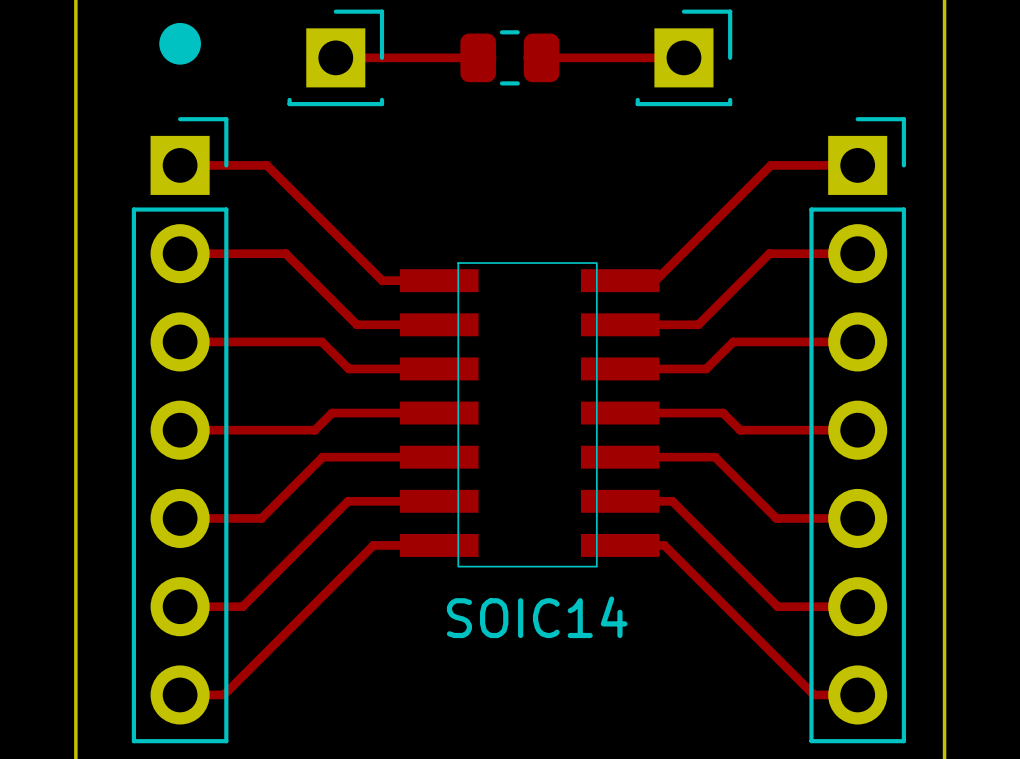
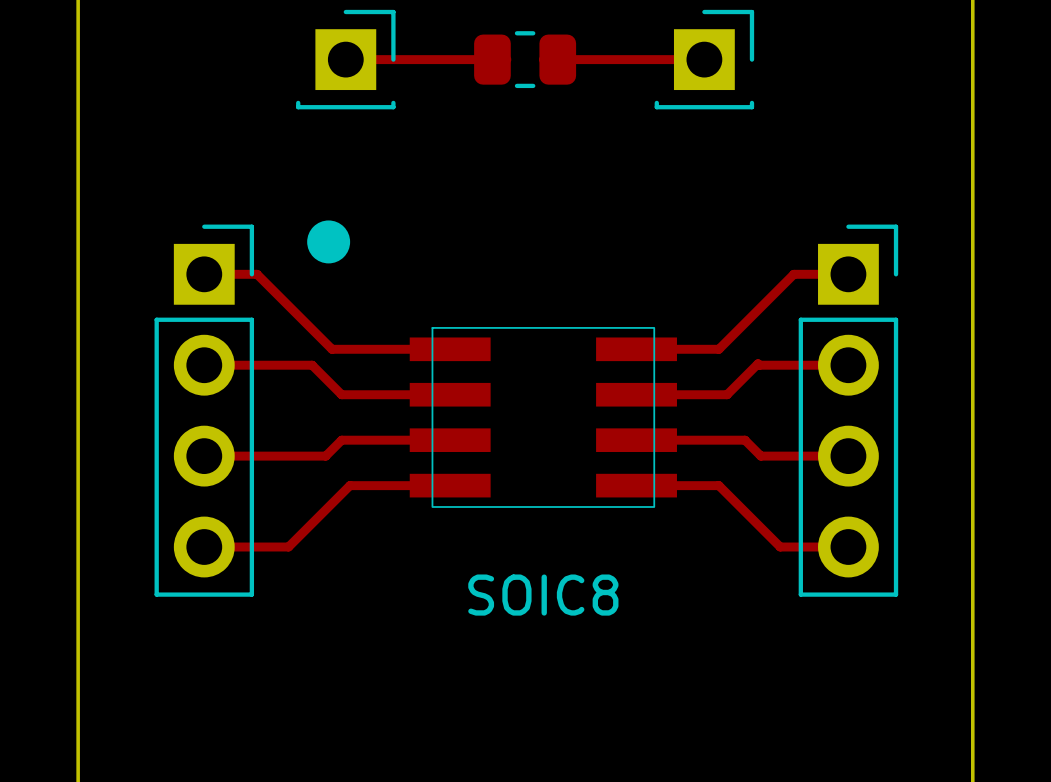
drawing position: (180, 43) -> (328, 241)
track: (180, 165) (266, 165) (382, 280) (439, 280) -> none
track: (857, 165) (770, 165) (655, 280) (620, 280) -> none
track: (180, 253) (285, 253) (356, 324) (439, 324) -> none
track: (857, 253) (769, 253) (698, 324) (620, 324) -> none
track: none -> (204, 274) (257, 274) (332, 349) (432, 349)
track: none -> (848, 274) (793, 274) (718, 349) (618, 349)
track: (180, 341) (321, 341) (348, 368) (439, 368) -> none
track: (857, 341) (733, 341) (706, 368) (620, 368) -> none
track: none -> (204, 365) (312, 365) (341, 394) (432, 394)
track: none -> (848, 365) (758, 363) (727, 394) (618, 394)
part: none -> (204, 410)
part: none -> (848, 410)
SOIC8: none -> (543, 417)
track: (439, 413) (332, 413) (314, 430) (180, 430) -> none
track: (620, 413) (723, 413) (740, 430) (857, 430) -> none
SOIC14: (529, 414) -> none
track: none -> (432, 440) (341, 440) (325, 456) (204, 456)
track: none -> (618, 440) (745, 440) (760, 456) (848, 456)
part: (180, 430) -> none
part: (857, 430) -> none
track: (439, 457) (322, 457) (261, 518) (180, 518) -> none
track: (620, 457) (715, 457) (776, 518) (857, 518) -> none
track: none -> (432, 485) (349, 485) (288, 547) (204, 547)
track: none -> (618, 485) (718, 485) (780, 547) (848, 547)
track: (439, 501) (348, 501) (242, 606) (180, 606) -> none
track: (620, 501) (672, 501) (777, 606) (857, 606) -> none
track: (439, 545) (373, 545) (223, 694) (180, 694) -> none
track: (620, 545) (664, 545) (813, 694) (857, 694) -> none

